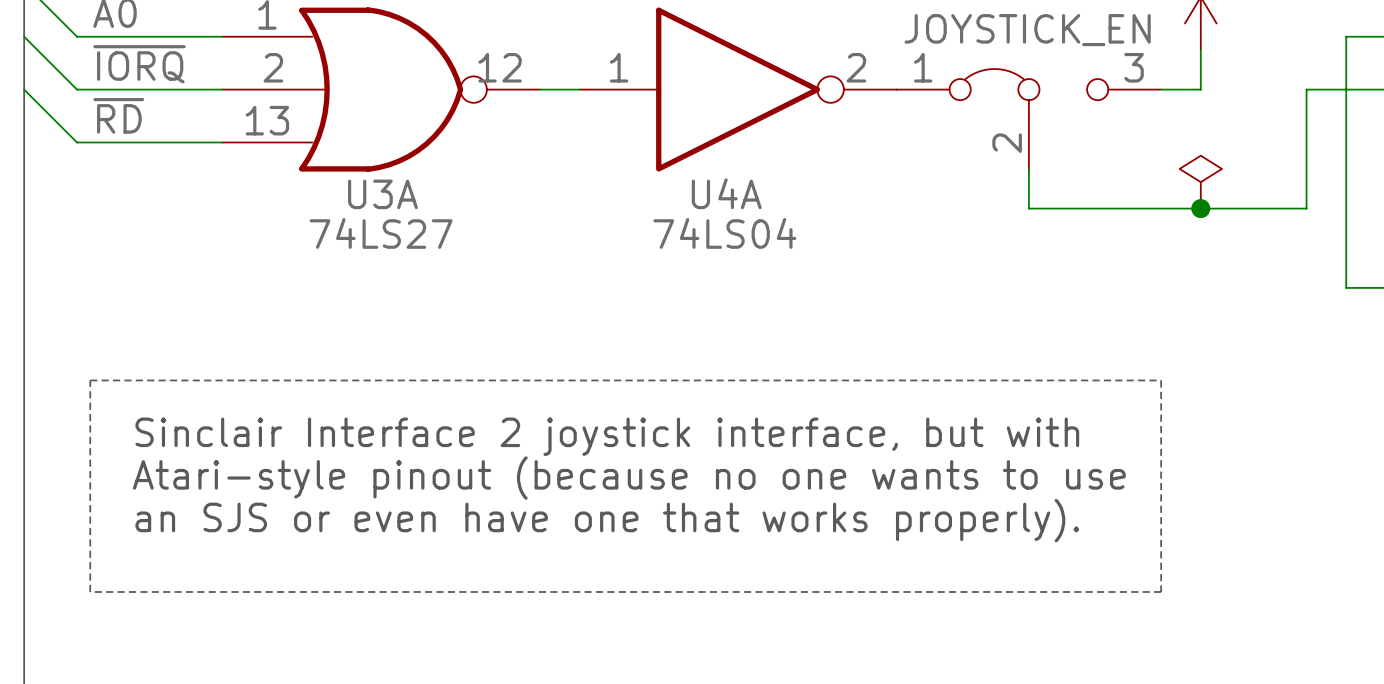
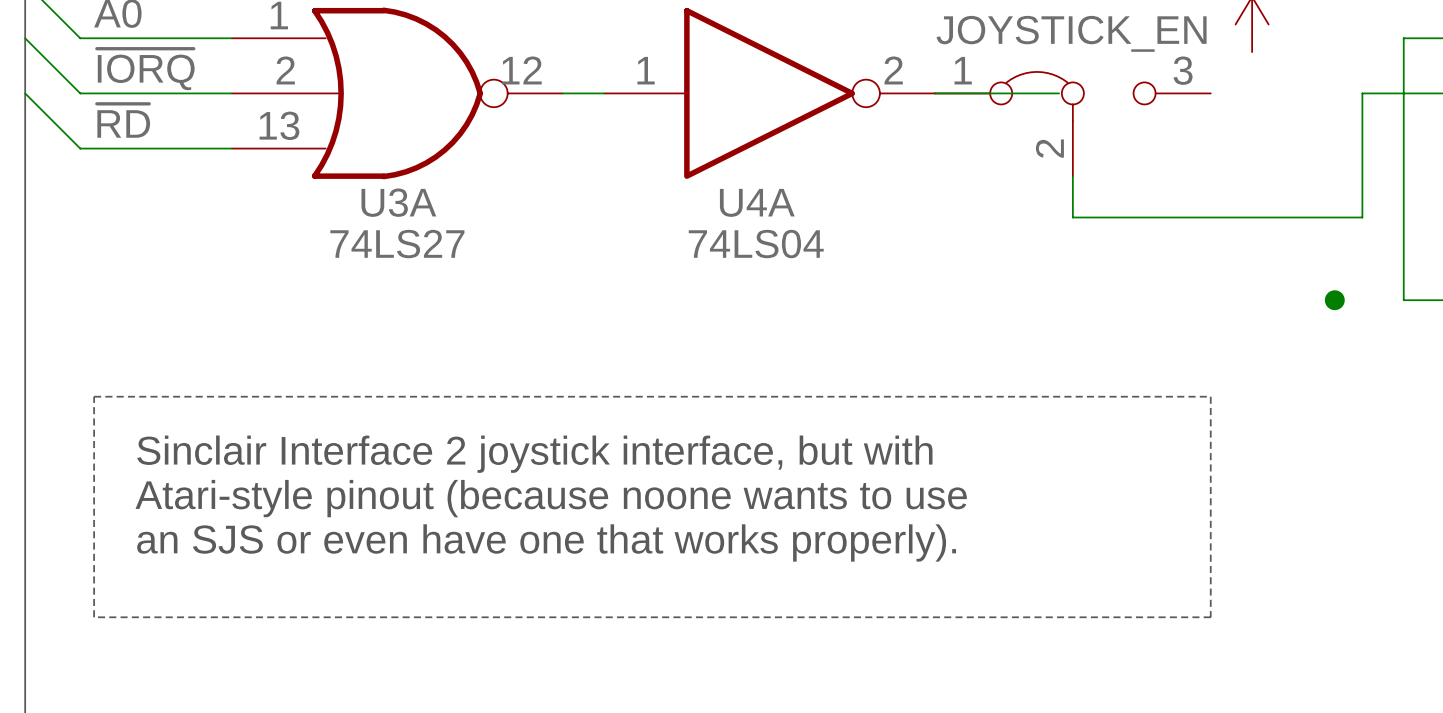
wire: (1200, 49) (1200, 89) (1161, 89) -> none
wire: none -> (935, 93) (1059, 93)
power symbol: (1200, 182) -> none
junction position: (1200, 208) -> (1334, 300)
text: Atari-style pinout (because no one wants to use (629, 478) -> Atari-style pinout (because noone wants to use (551, 498)

